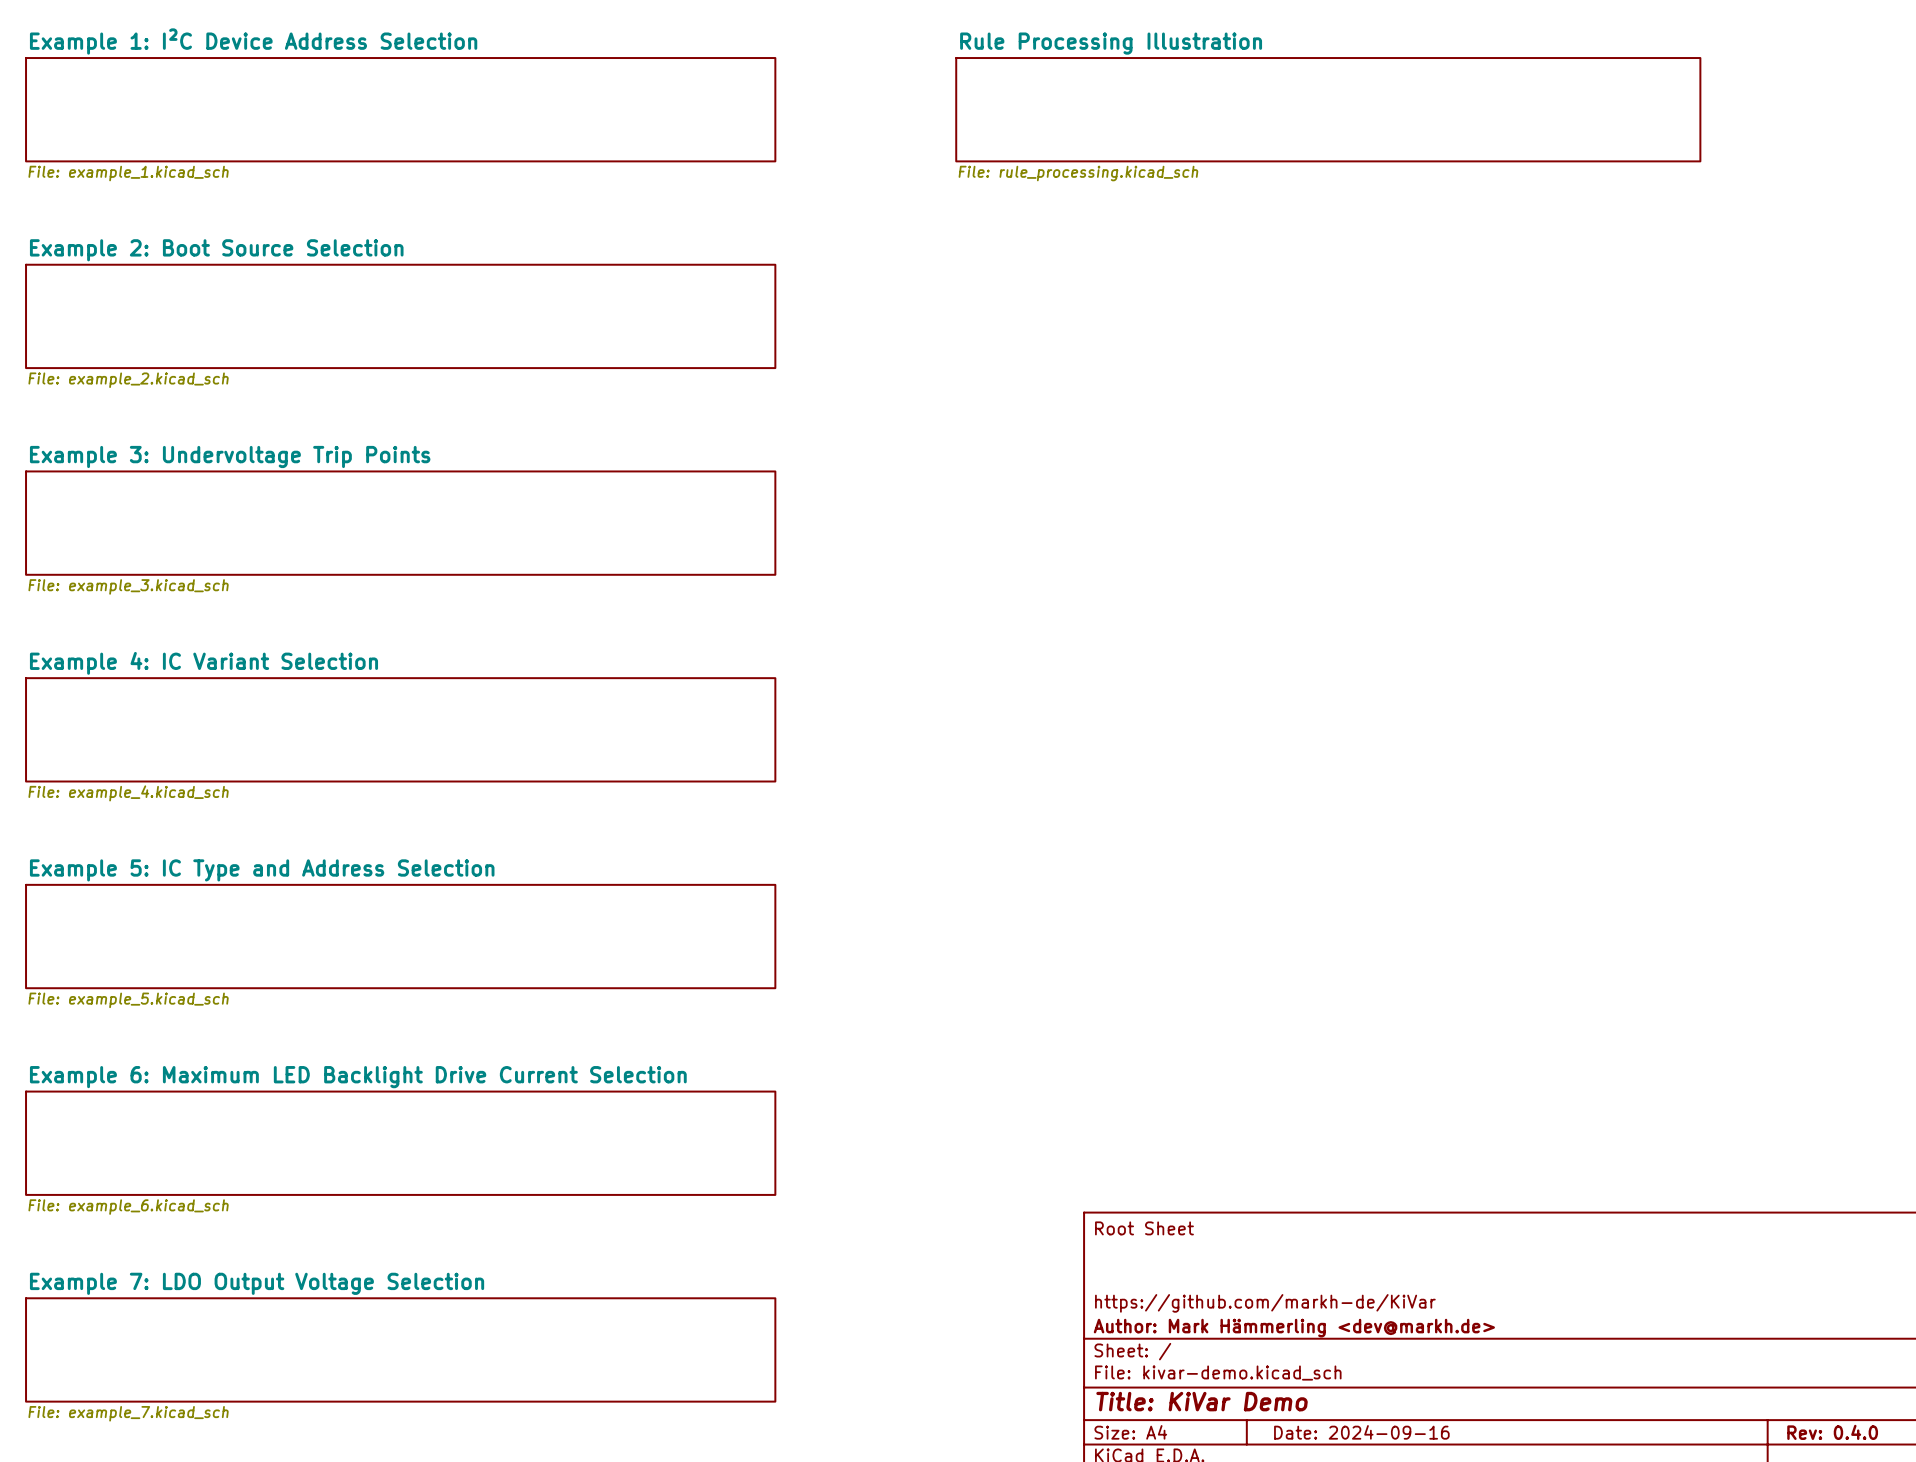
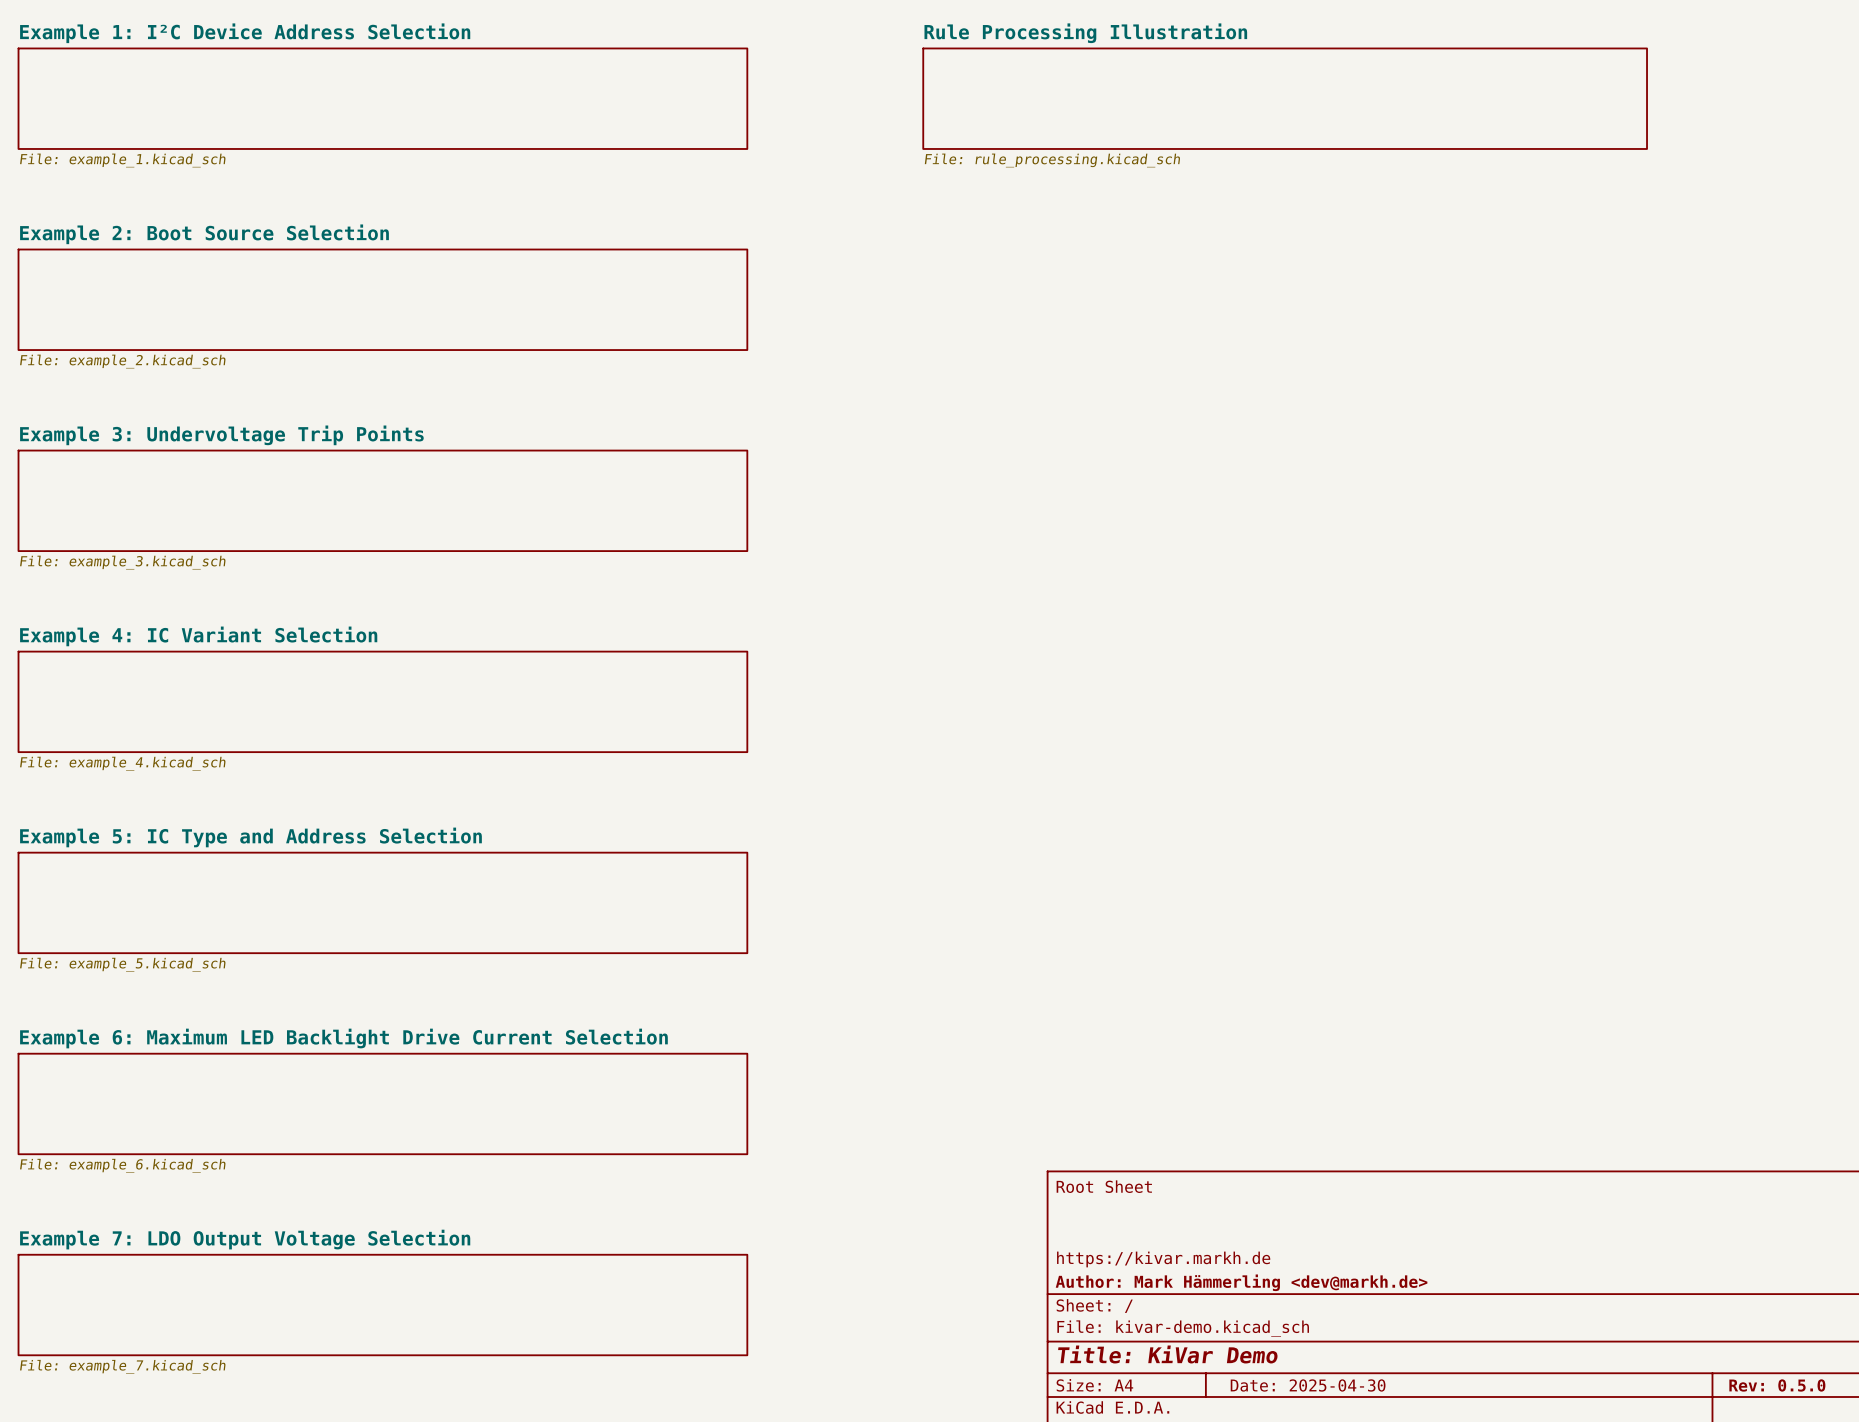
title block: https://github.com/markh-de/KiVar (1265, 1303) -> https://kivar.markh.de (1163, 1259)
title block: Date: 2024-09-16 (1361, 1432) -> Date: 2025-04-30 (1308, 1385)
title block: Rev: 0.4.0 (1832, 1432) -> Rev: 0.5.0 (1777, 1385)

